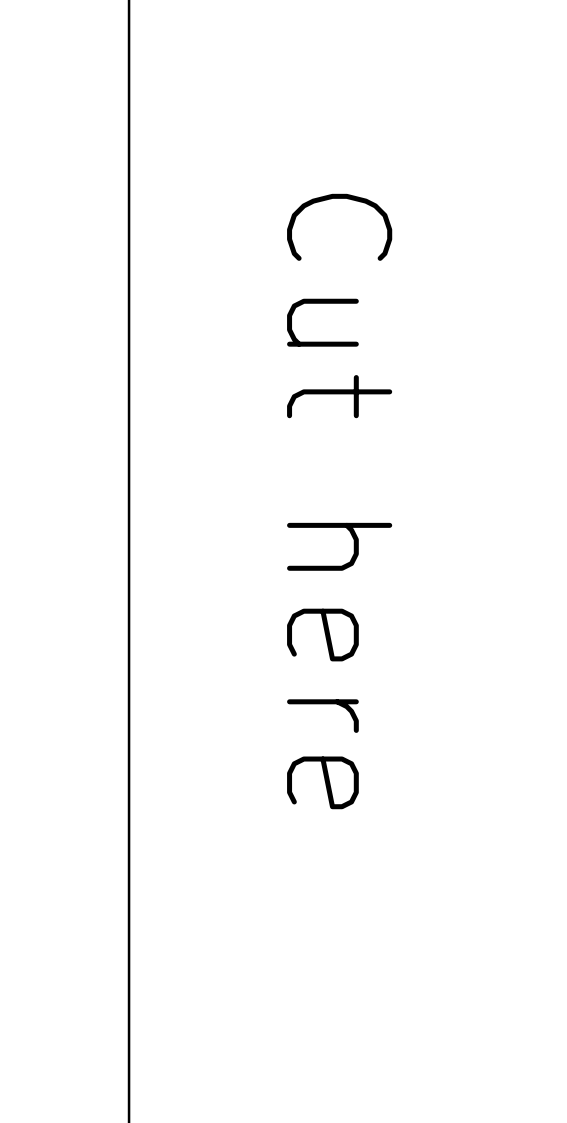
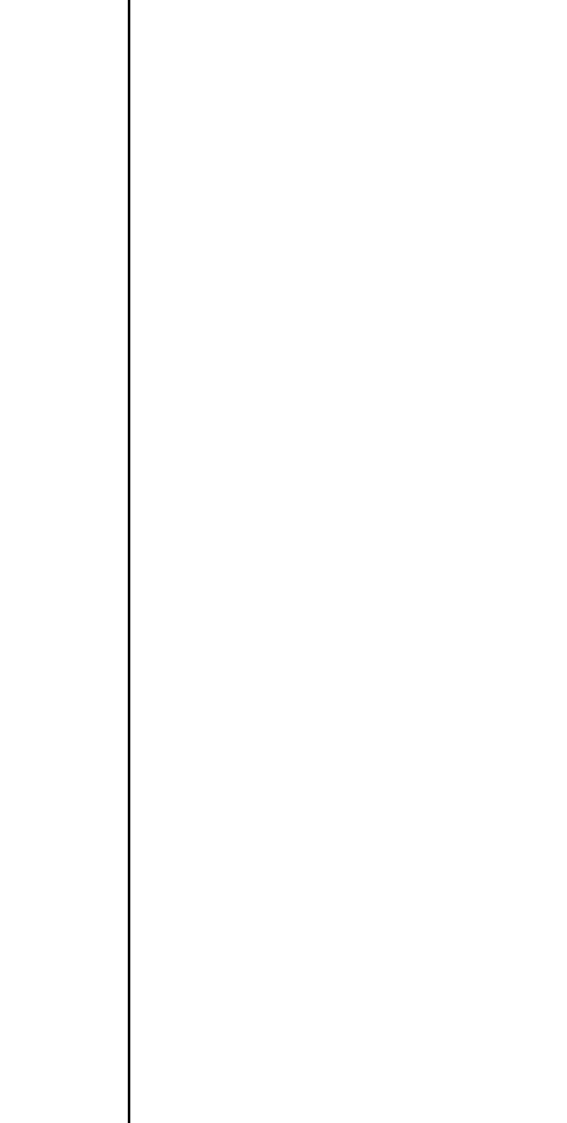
text: Cut here (339, 501) -> none

